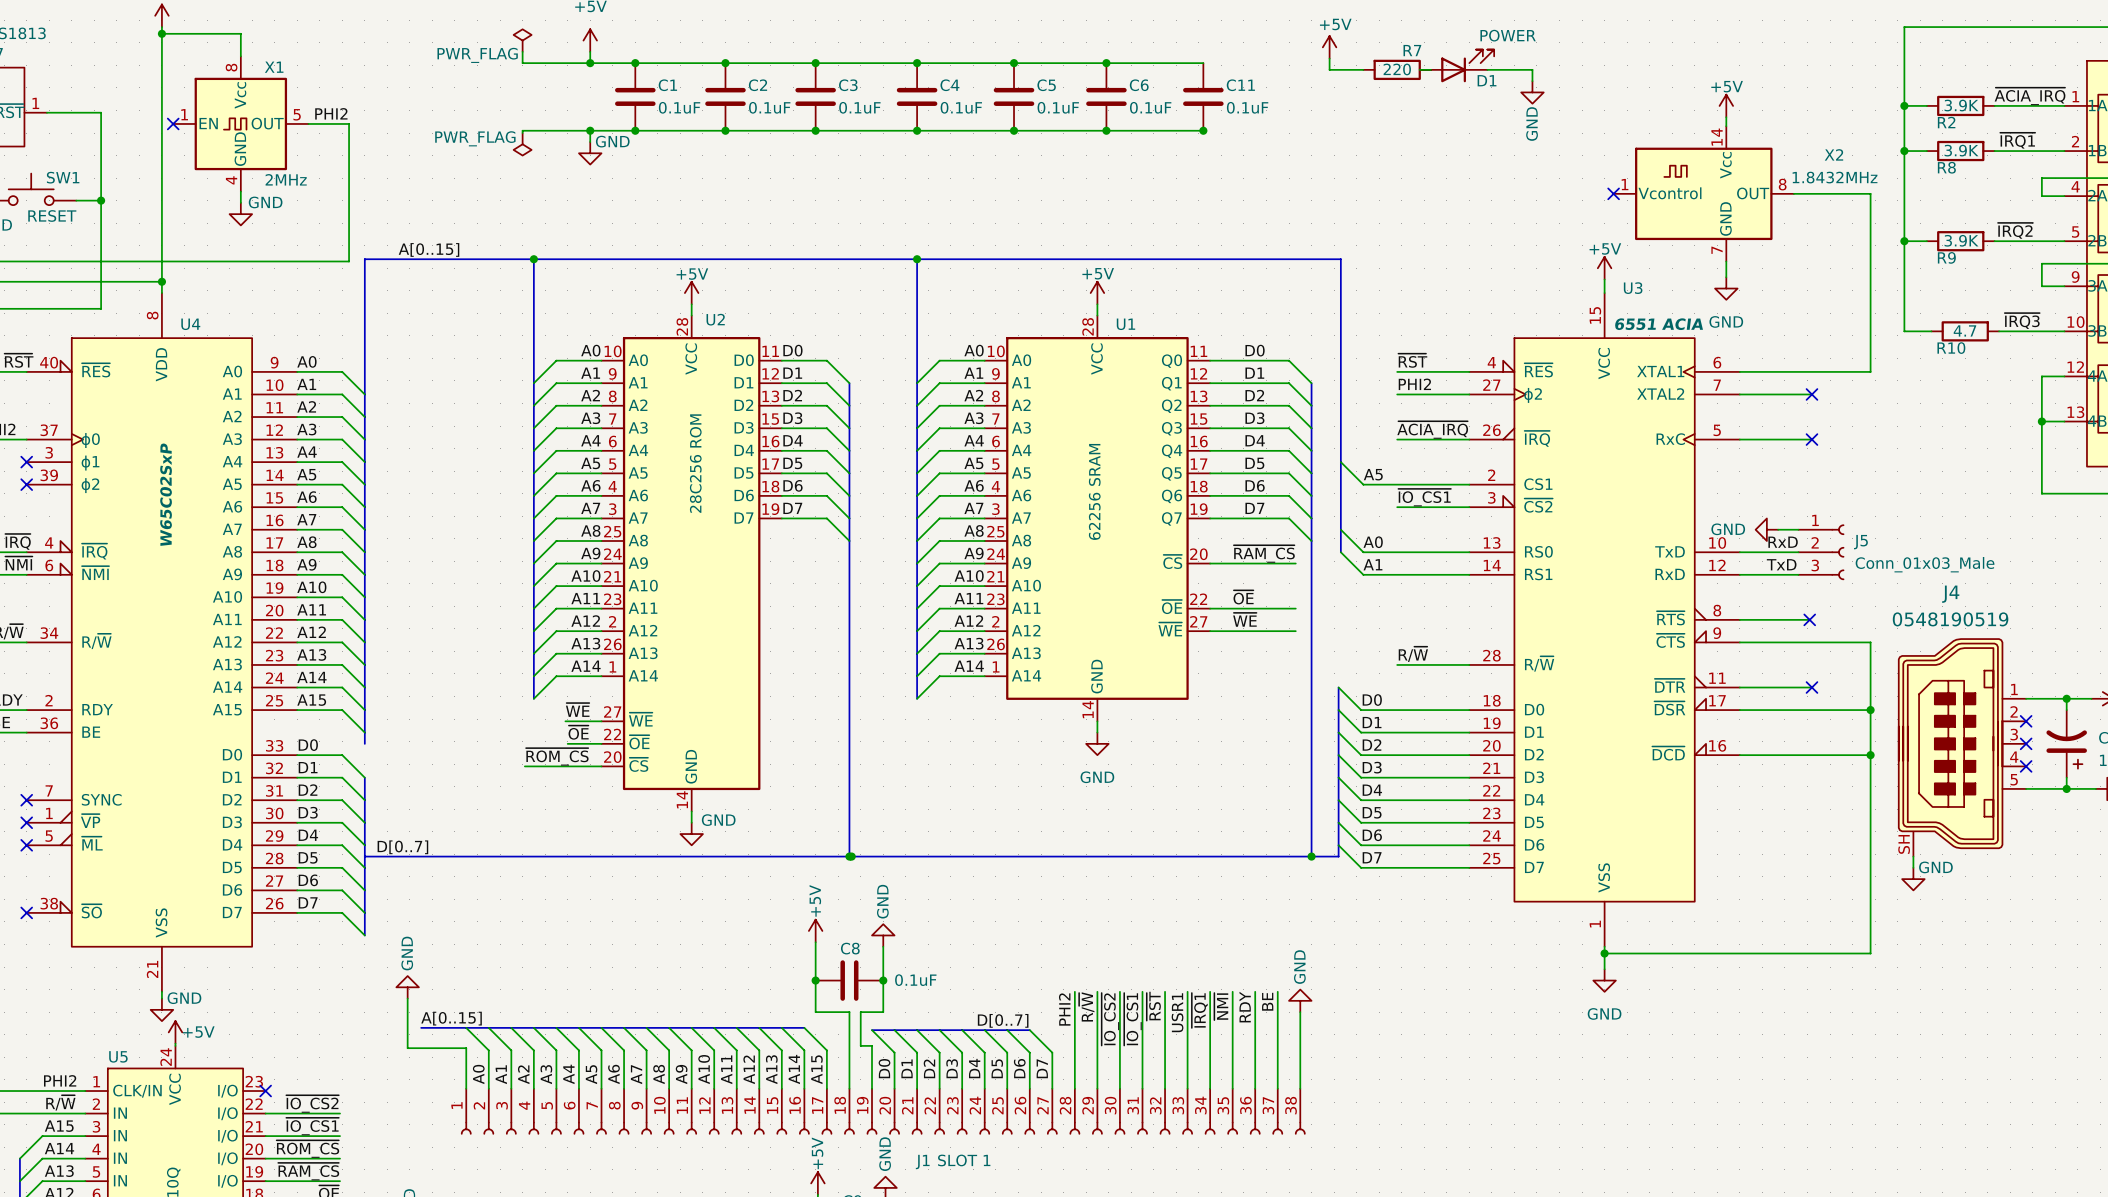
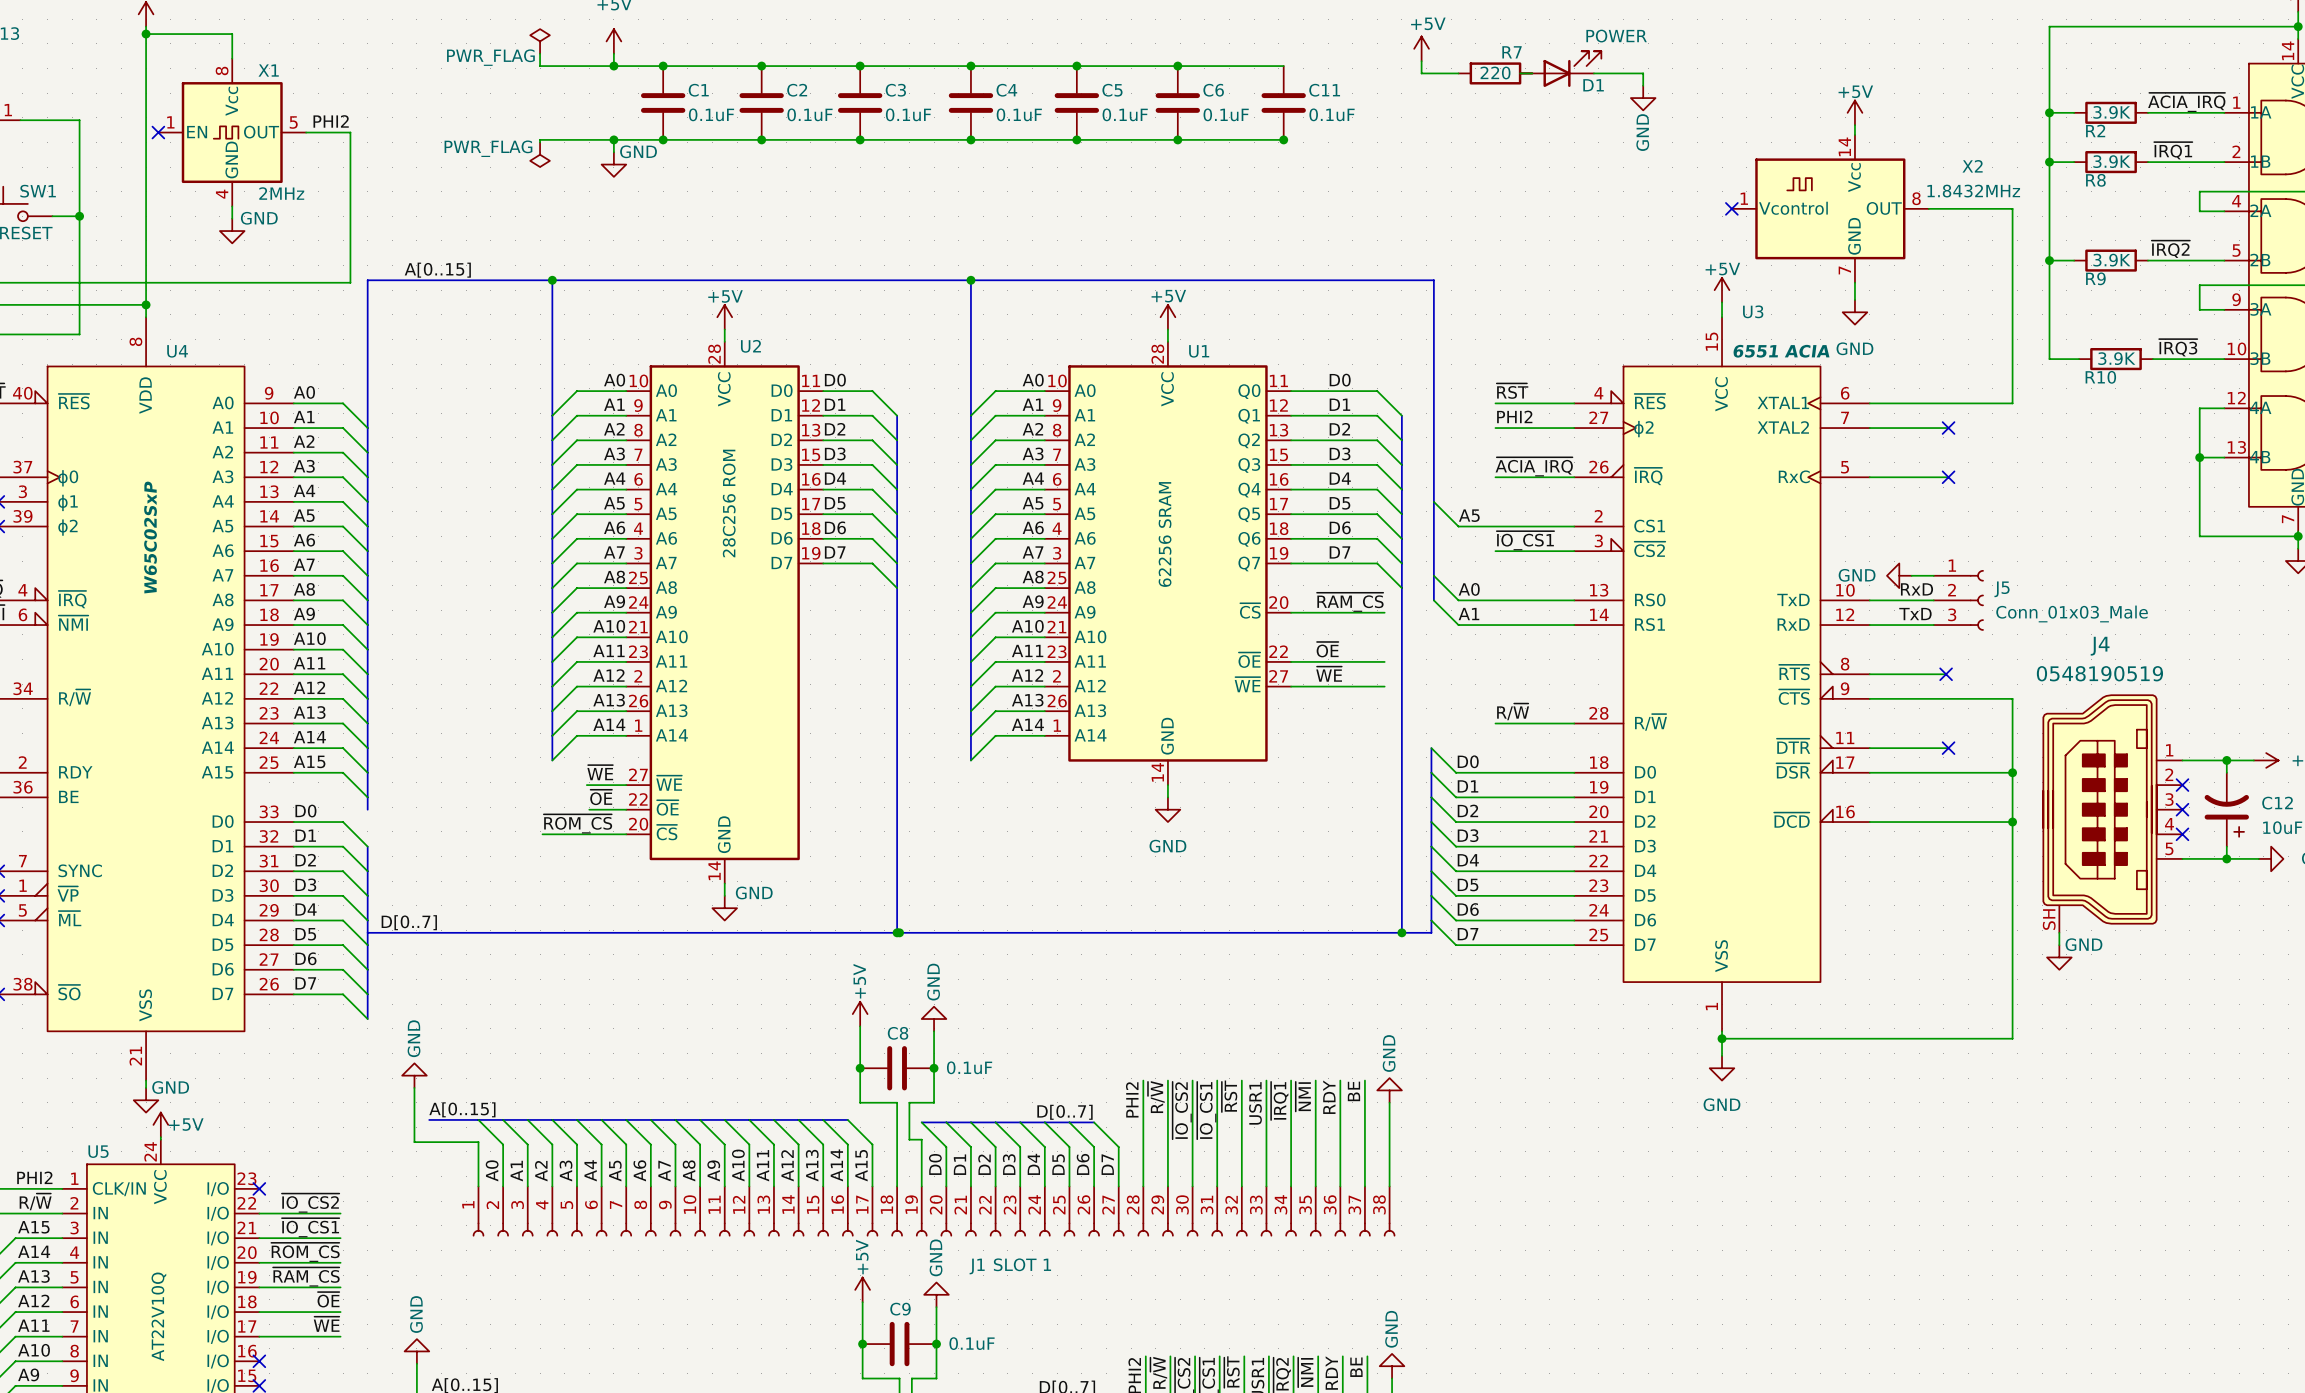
R10 value: 4.7 (1964, 330) -> 3.9K (2116, 358)

